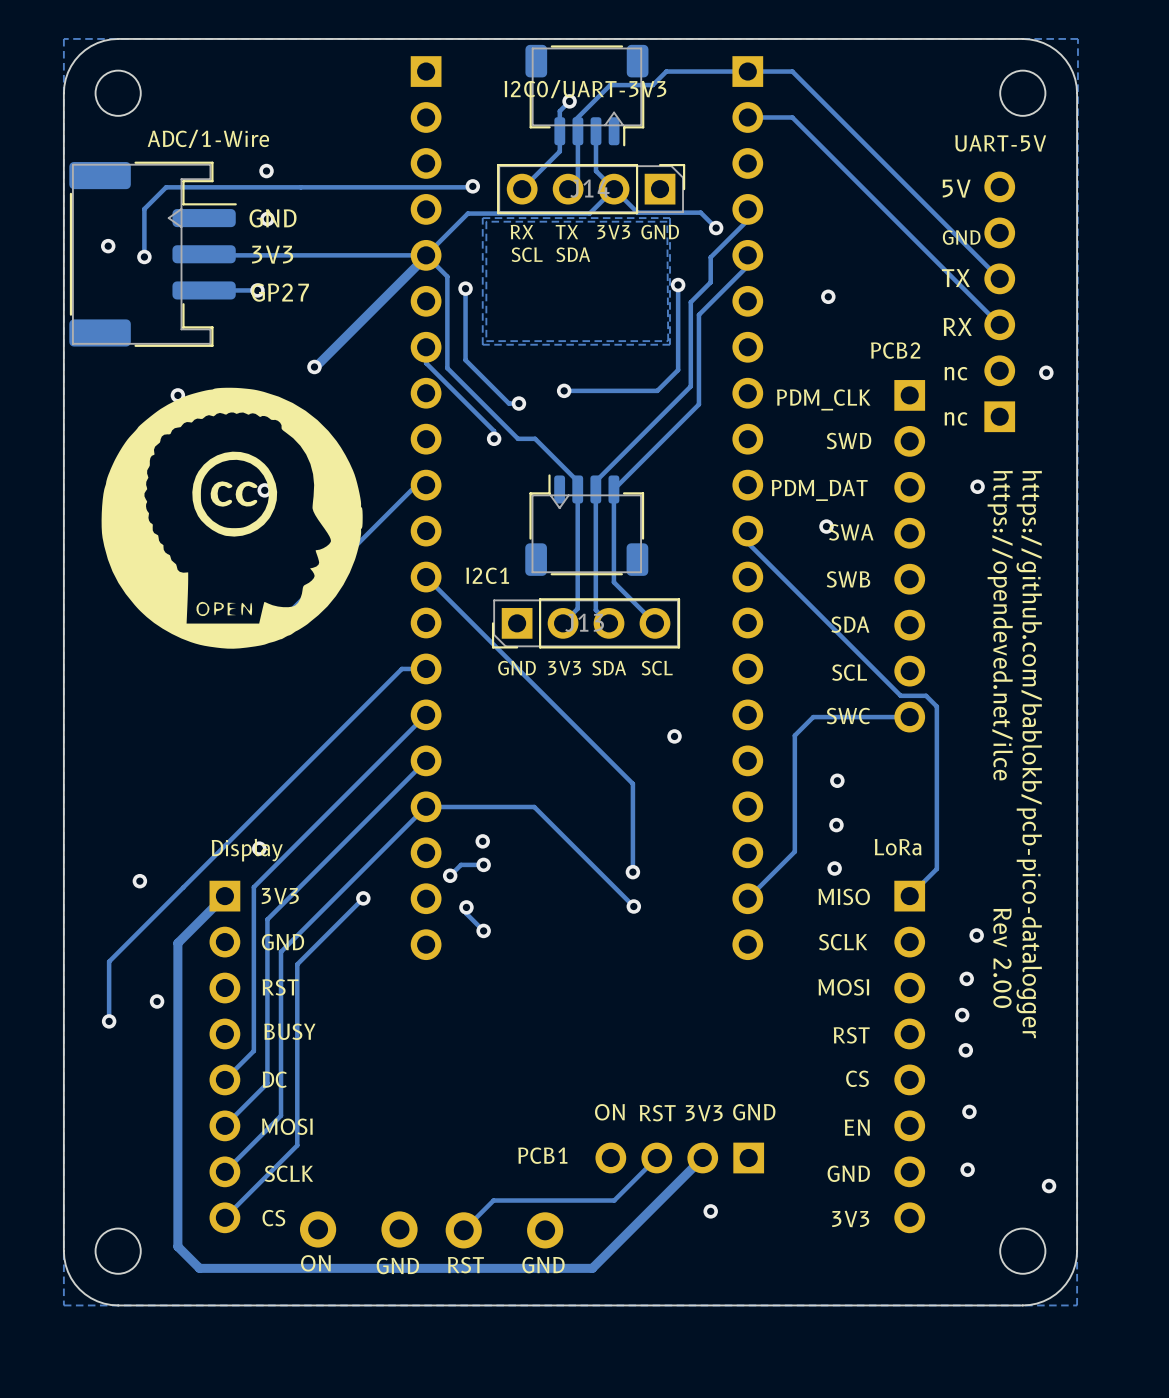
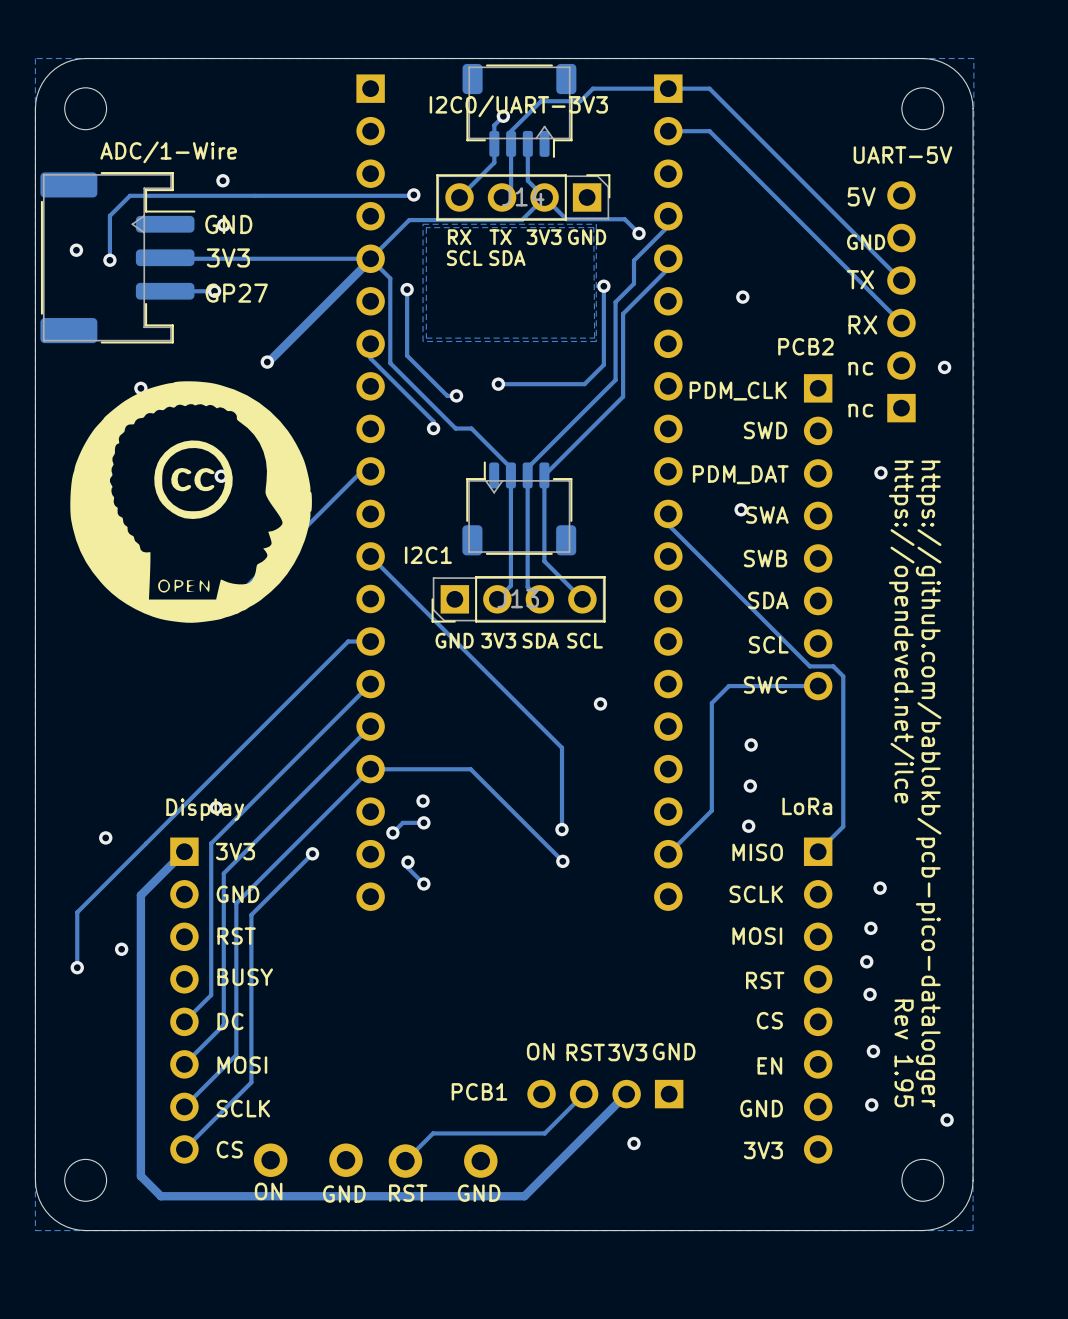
text: https://opendeved.net/ilce Rev 2.00 (1000, 739) -> https://opendeved.net/ilce Rev 1.95 (901, 783)

